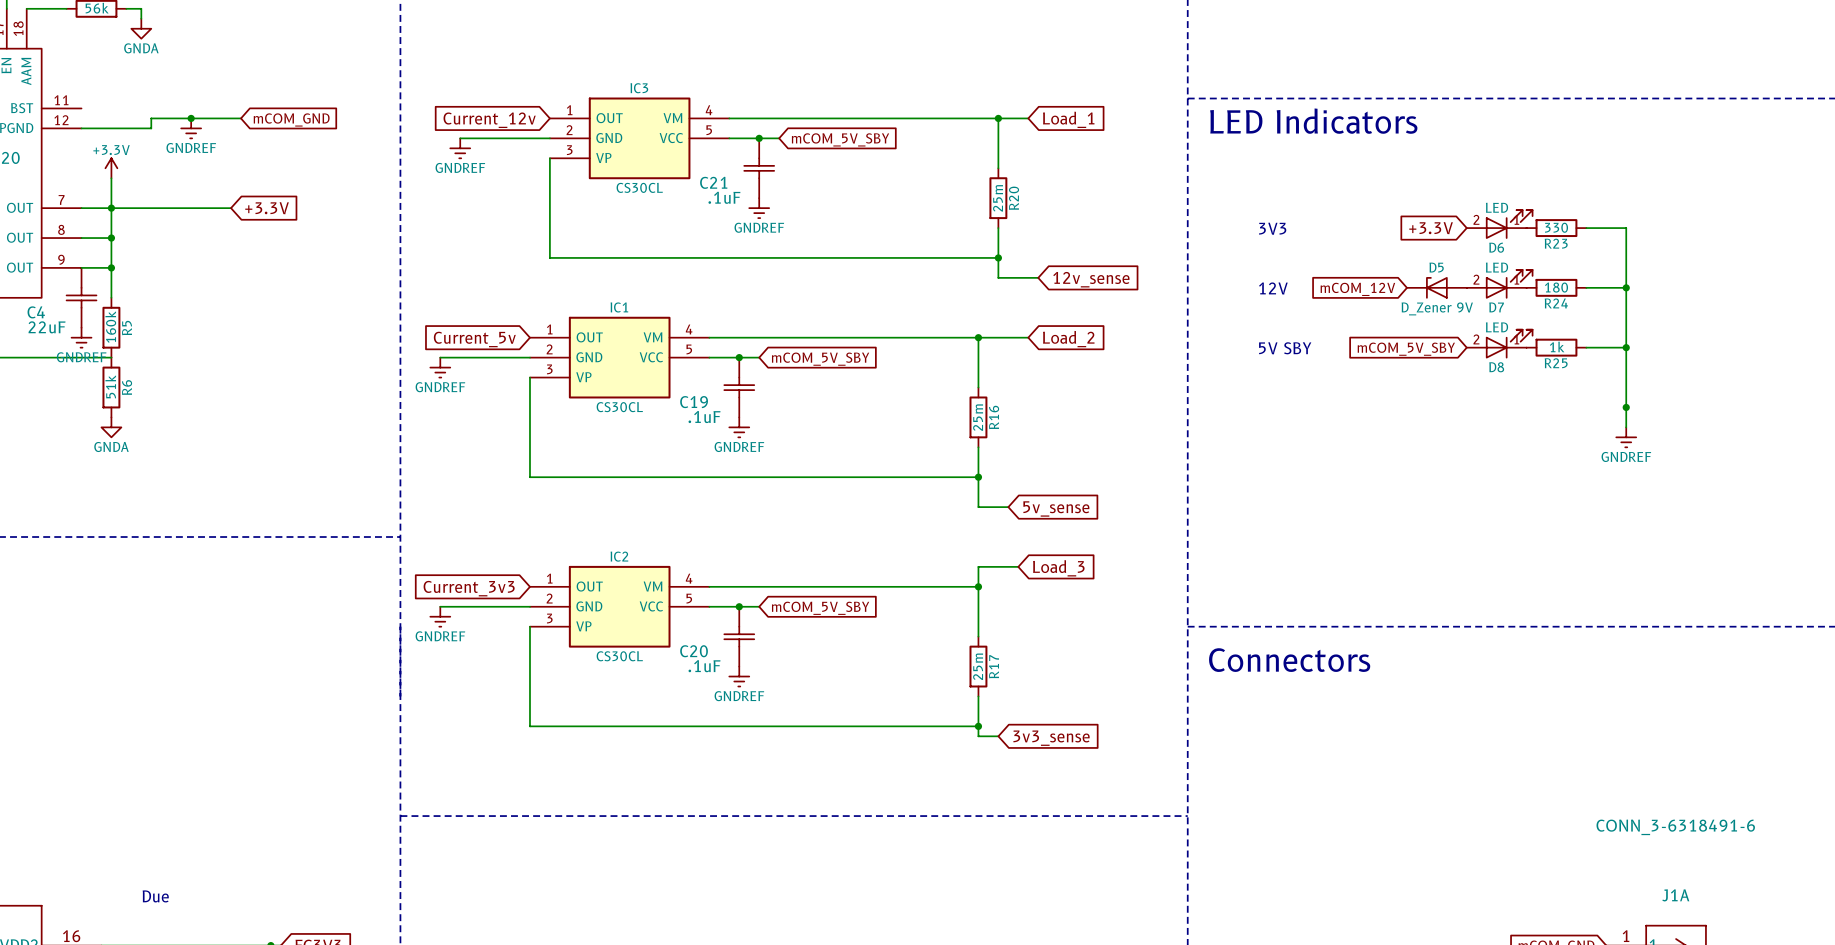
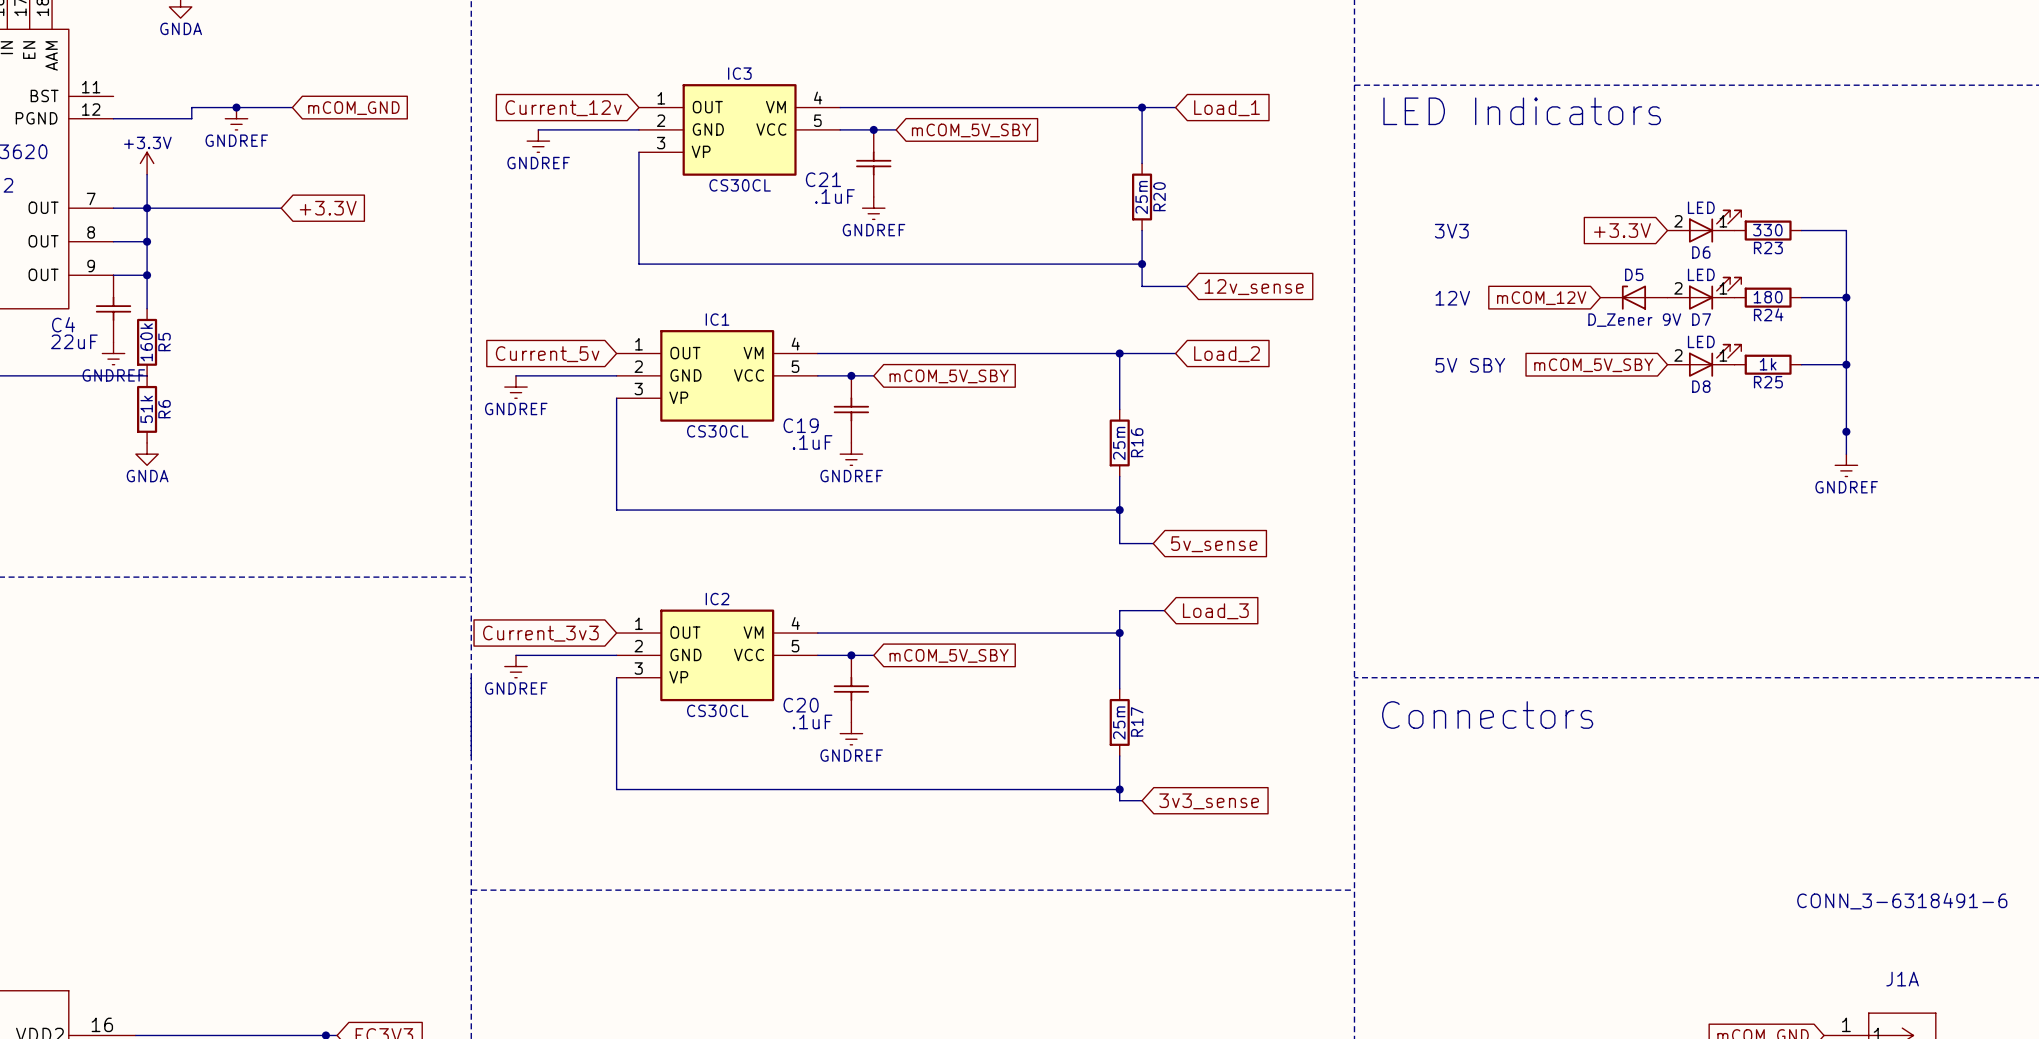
text: Due (155, 896) -> none

